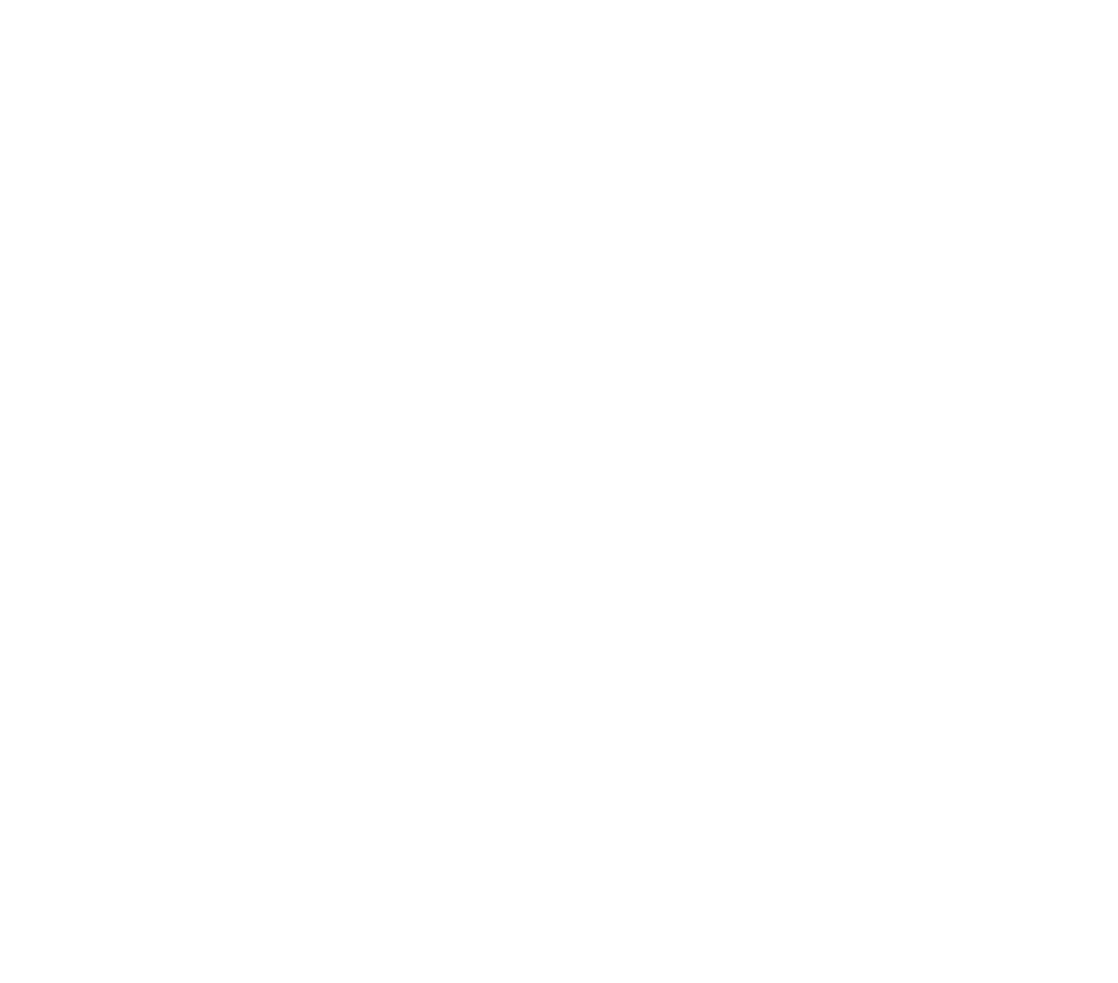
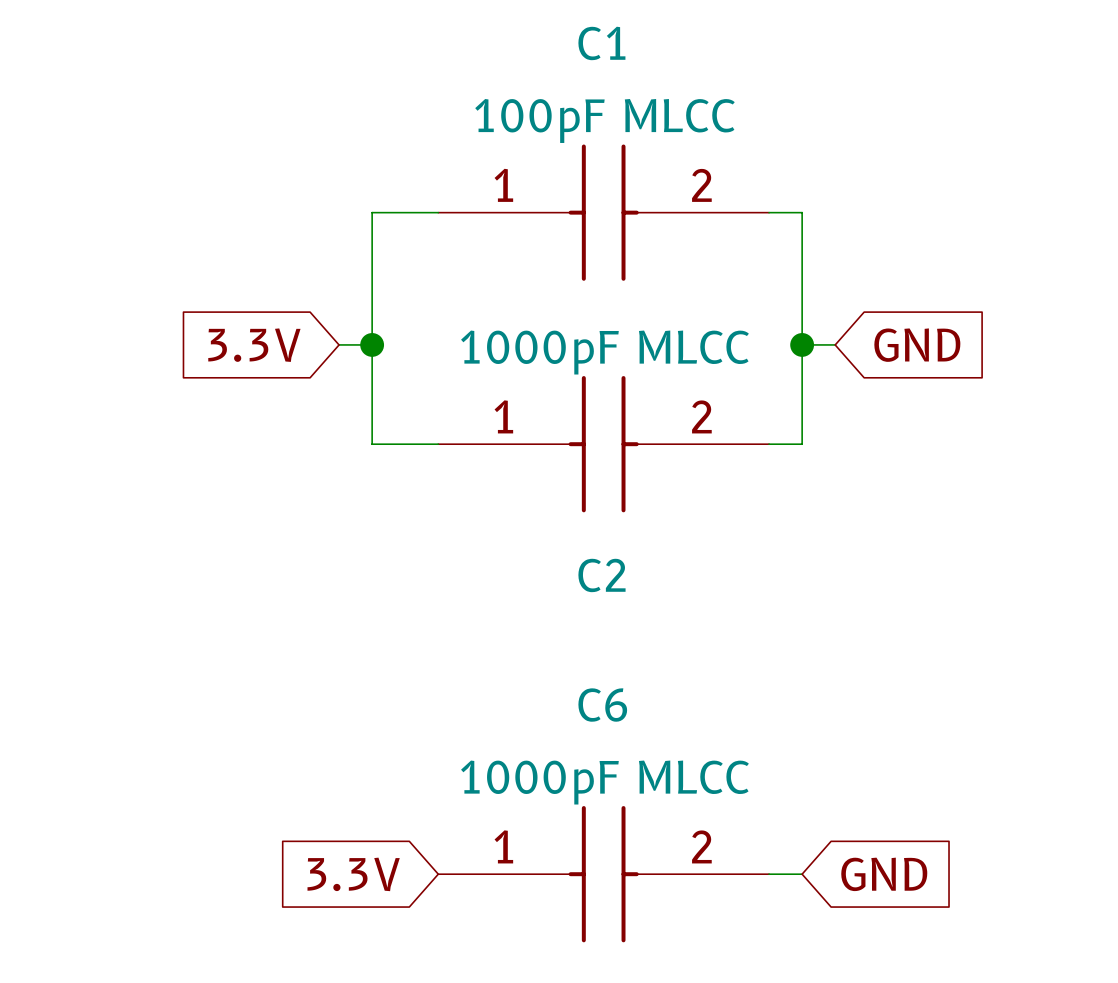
wire: none -> (438, 212) (372, 212) (372, 444) (438, 444)
C1: none -> 100pF MLCC (603, 212)
wire: none -> (769, 212) (802, 212) (802, 444) (769, 444)
global label: none -> 3.3V (254, 345)
wire: none -> (339, 344) (372, 344)
junction: none -> (372, 344)
wire: none -> (802, 344) (835, 344)
junction: none -> (802, 344)
global label: none -> GND (917, 345)
C2: none -> 1000pF MLCC (603, 444)
global label: none -> 3.3V (353, 874)
C6: none -> 1000pF MLCC (603, 874)
wire: none -> (769, 874) (802, 874)
global label: none -> GND (884, 874)

